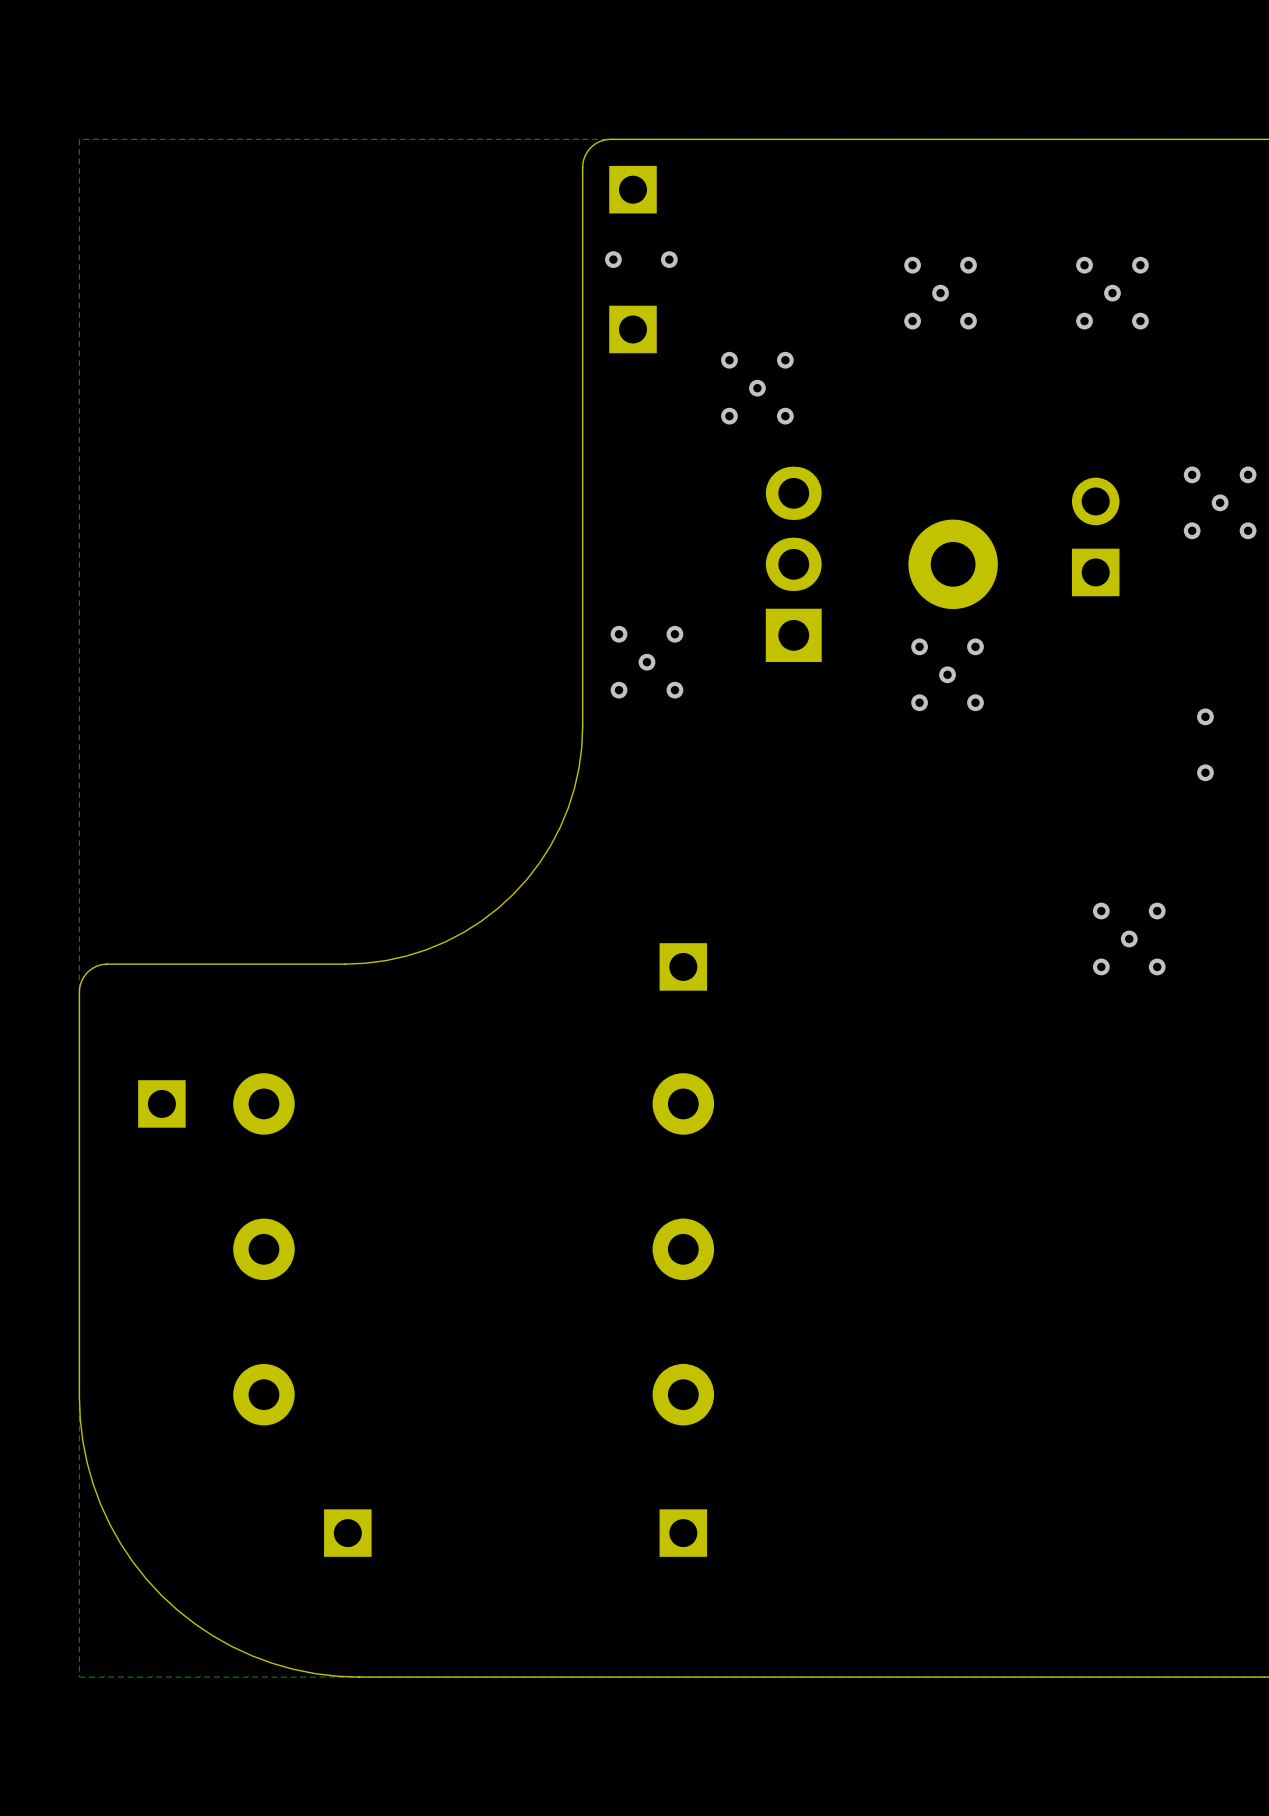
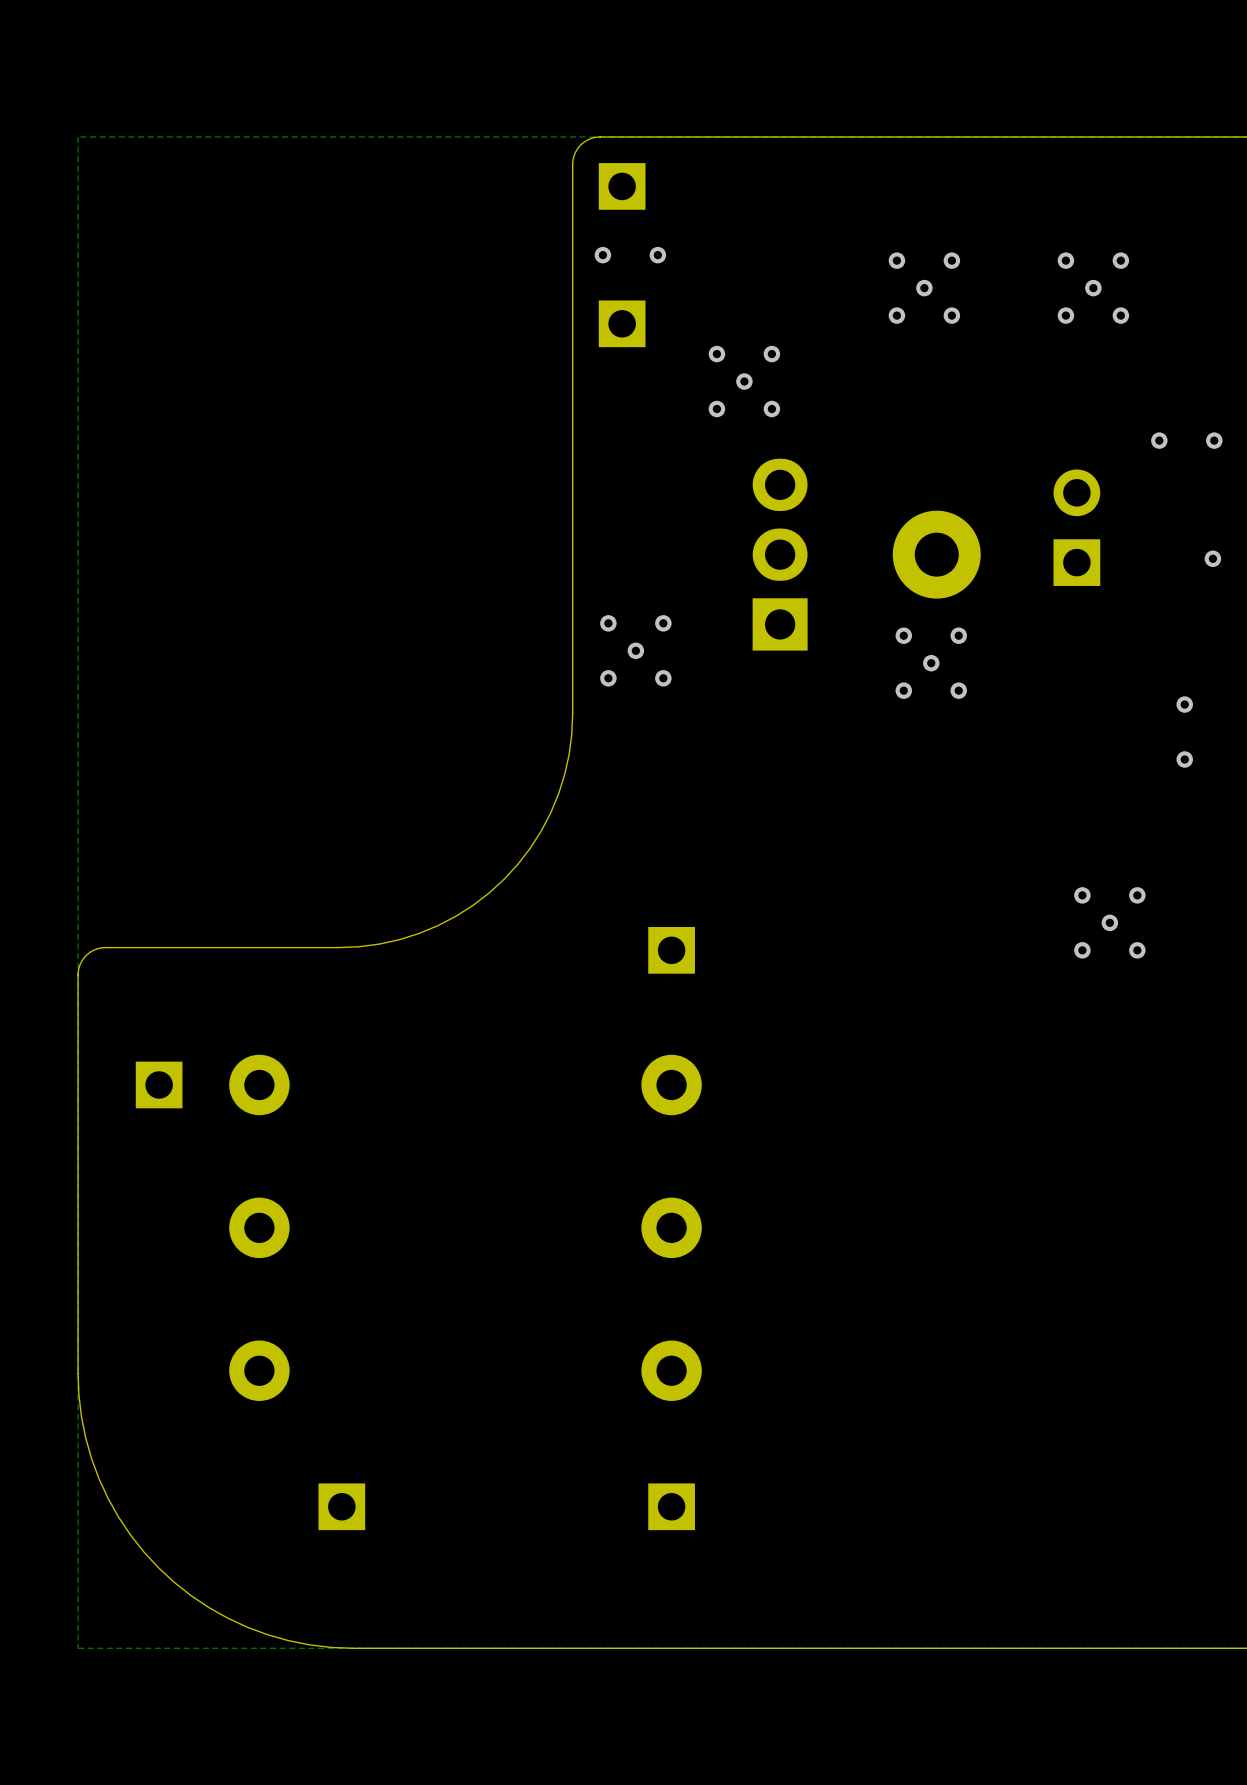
via: none -> (1159, 440)
via: none -> (1214, 440)
via: (1192, 474) -> none
via: (1248, 474) -> none
via: (1220, 502) -> none
via: (1192, 530) -> none
via: (1248, 530) -> none
via: none -> (1212, 558)

